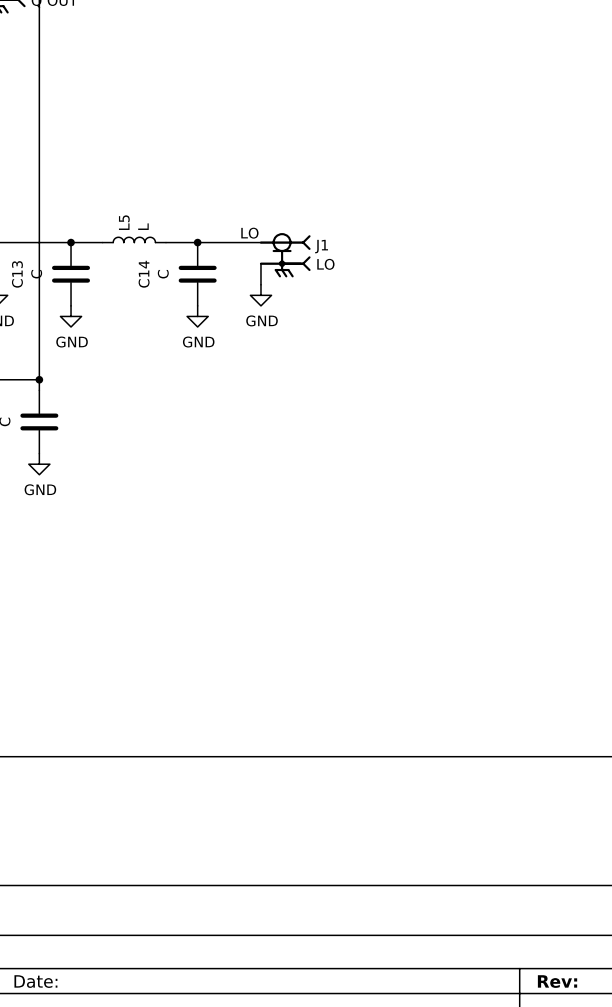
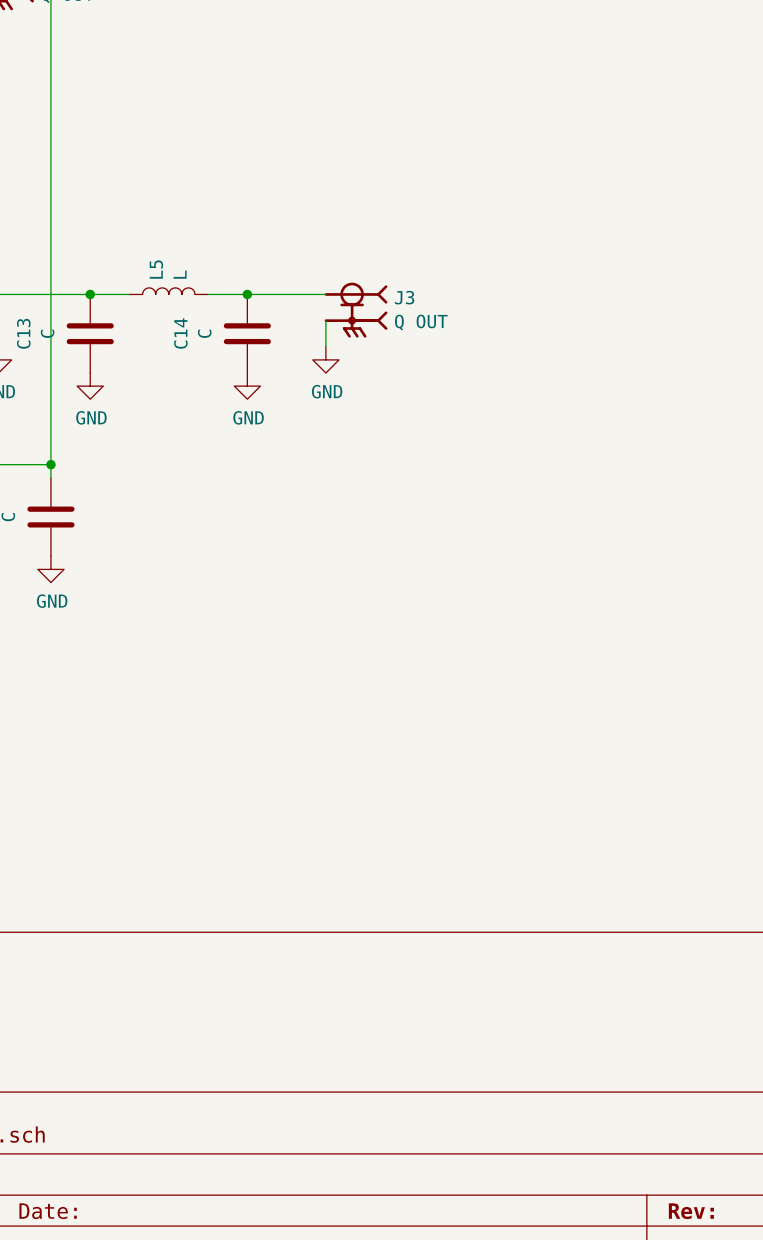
label: LO (249, 233) -> none
J1 name: J1 (321, 246) -> J3 (404, 297)
J1 value: LO (325, 264) -> Q OUT (421, 322)

